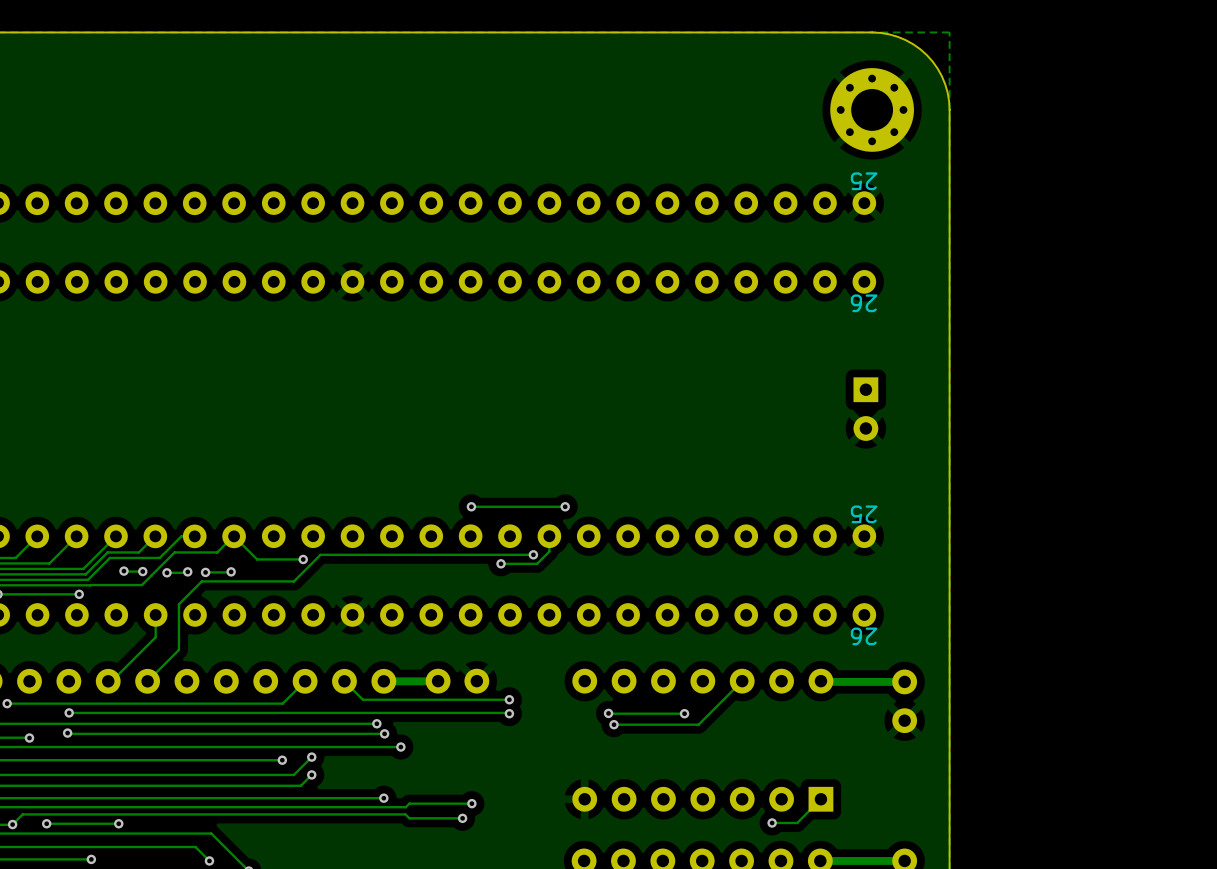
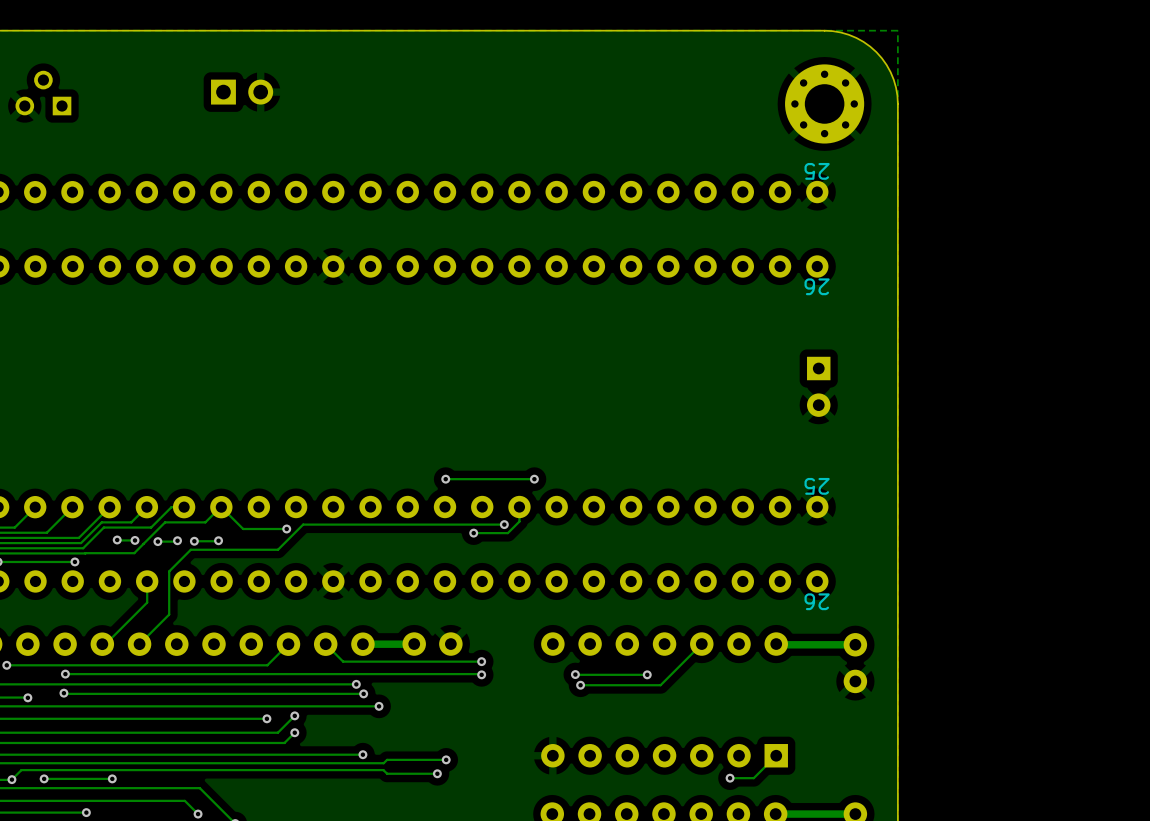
part: none -> (242, 92)
part: none -> (43, 93)

